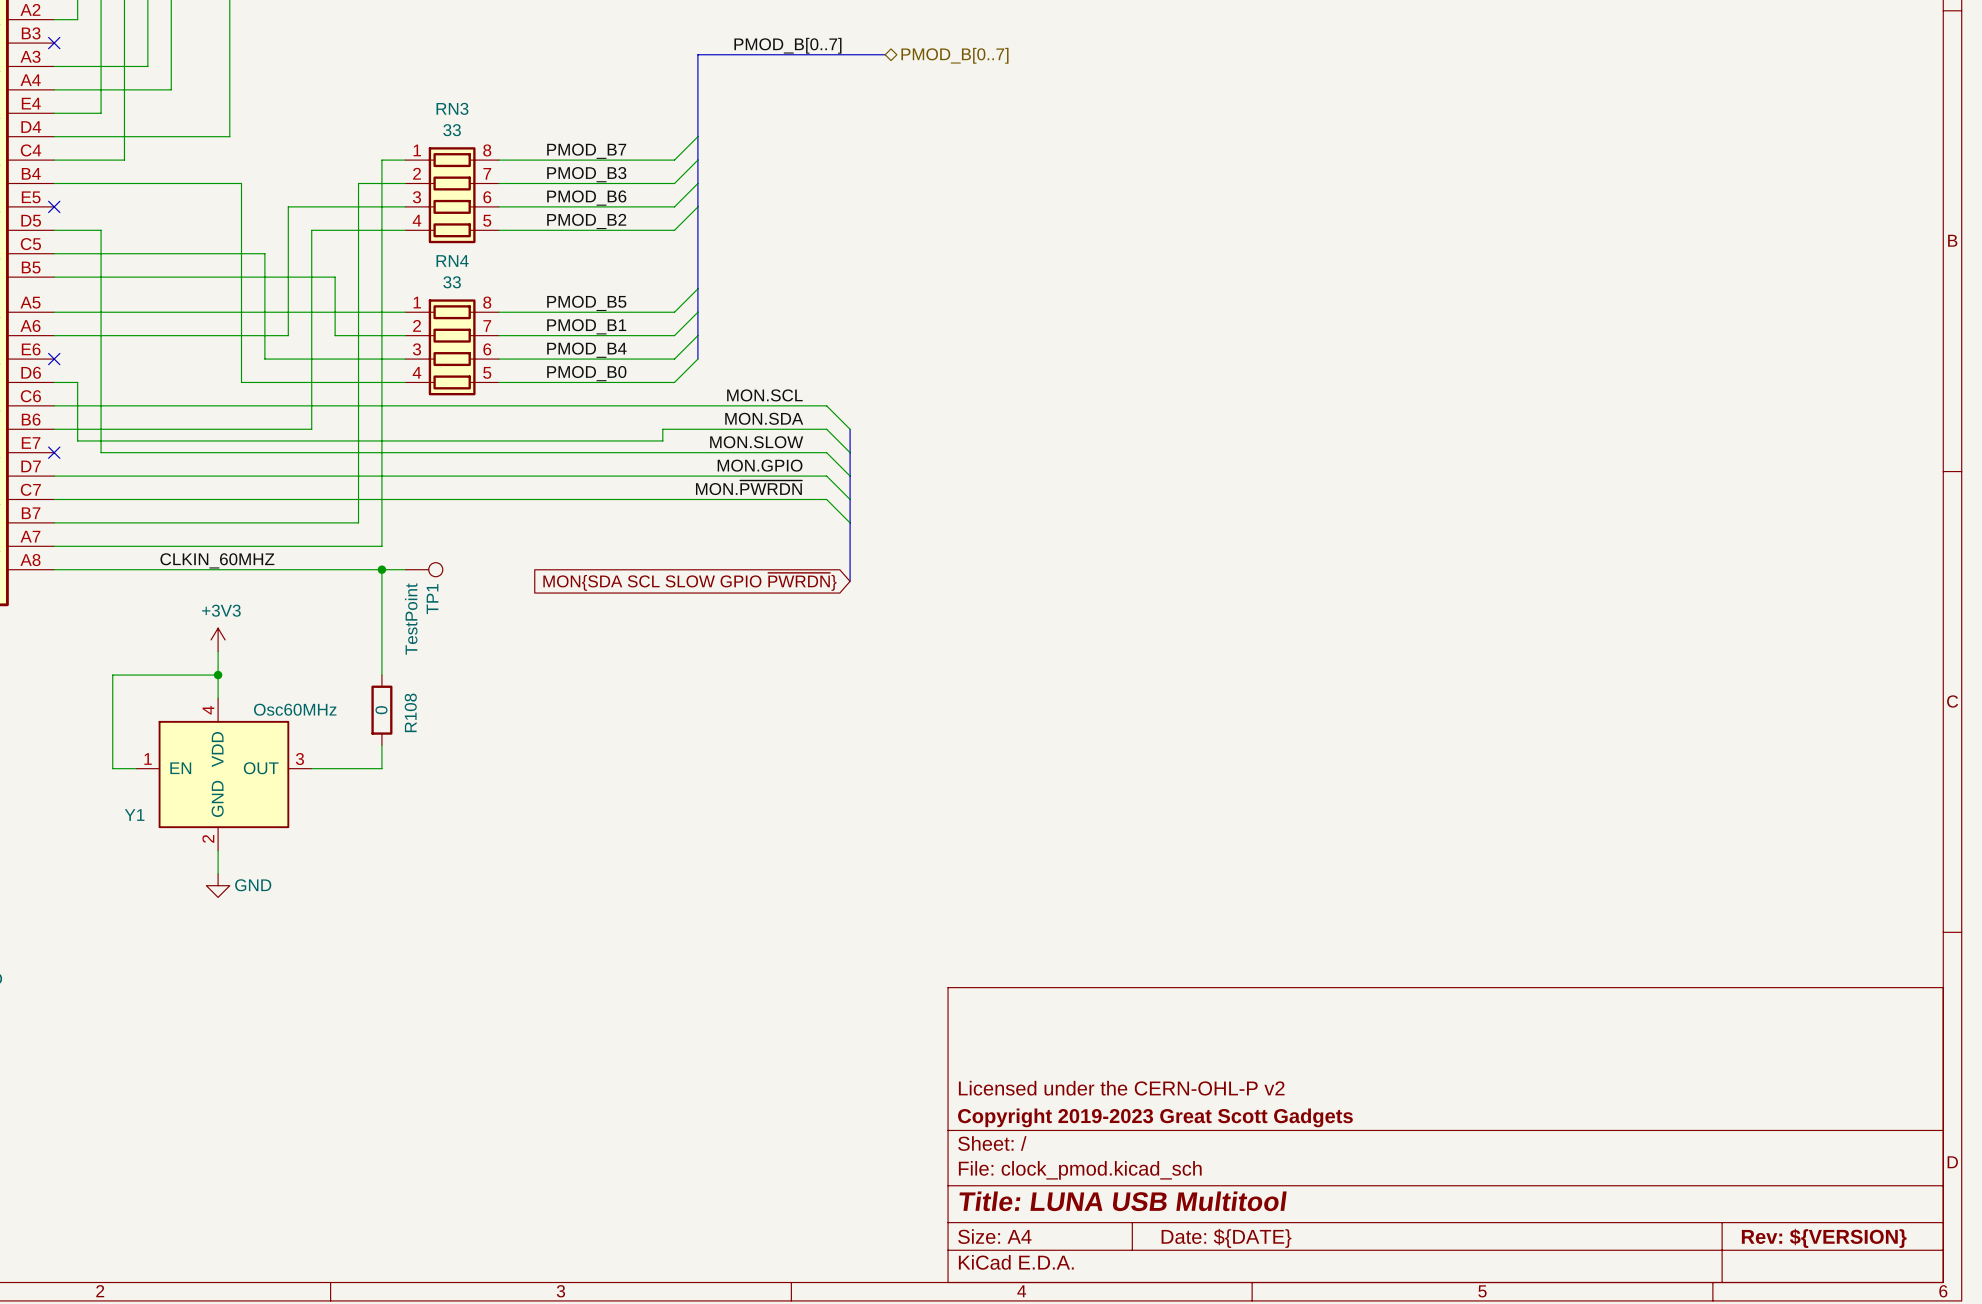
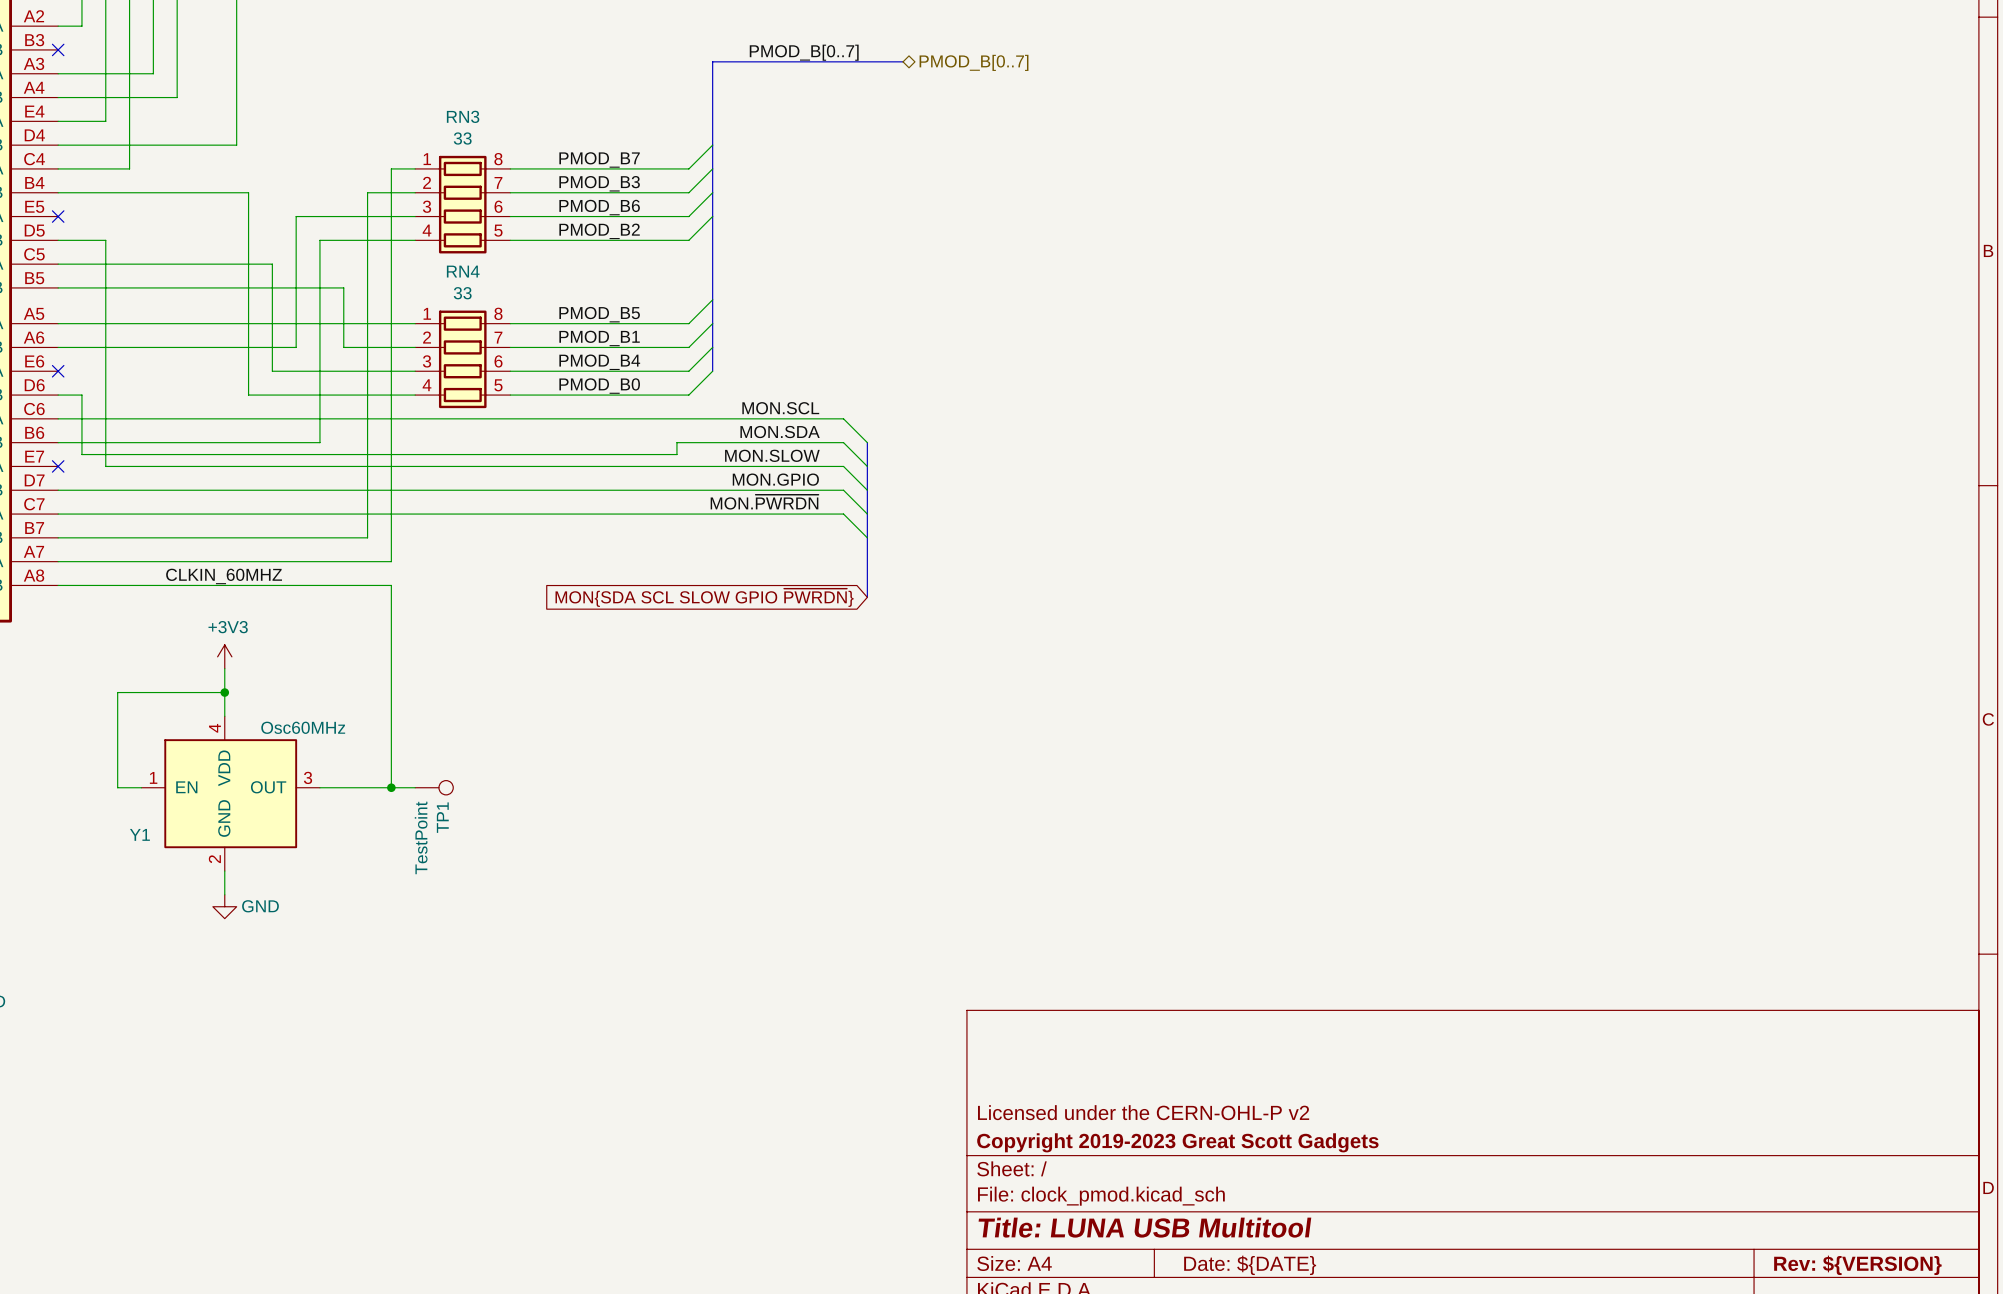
wire: (381, 569) (405, 569) -> (391, 787) (415, 787)
junction: (381, 569) -> none
TP1 position: (424, 569) -> (434, 787)
wire: none -> (391, 692) (391, 763)
R108: 0 (381, 710) -> none
junction: none -> (391, 787)

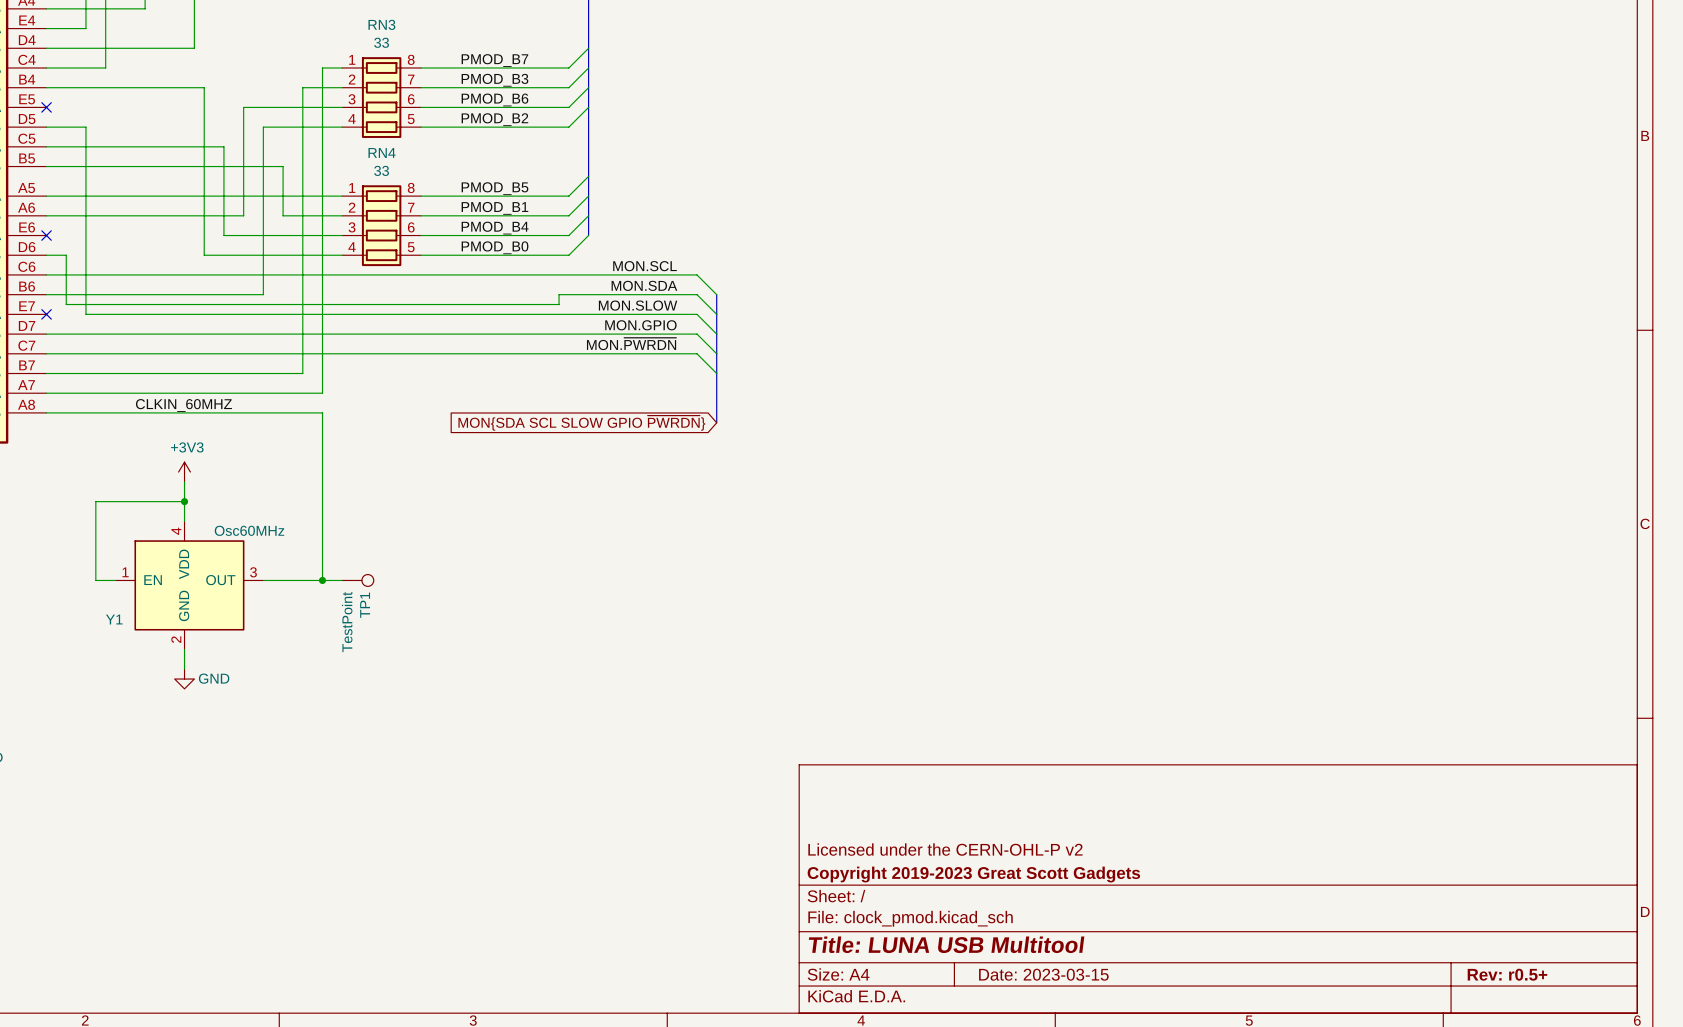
title block: Date: ${DATE} (1250, 1265) -> Date: 2023-03-15 (1043, 974)
title block: Rev: ${VERSION} (1857, 1265) -> Rev: r0.5+ (1507, 974)

